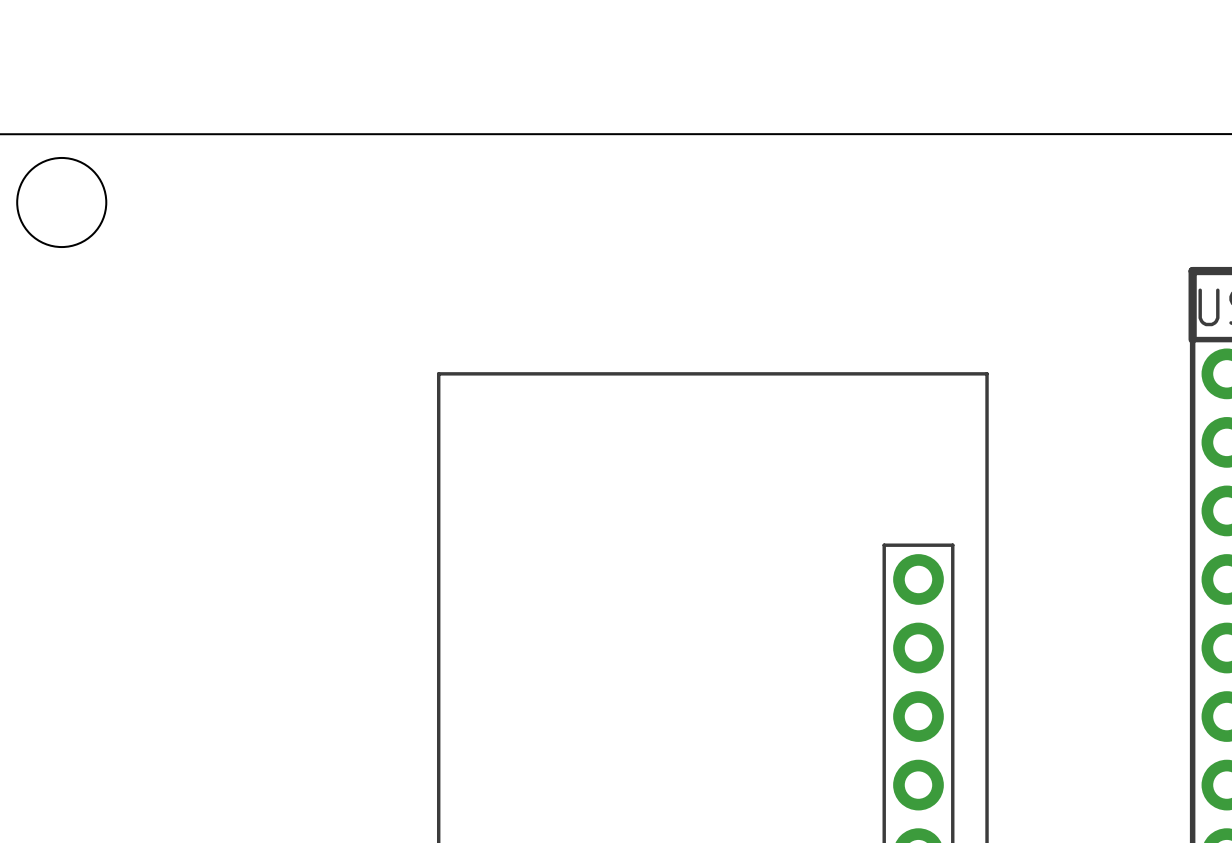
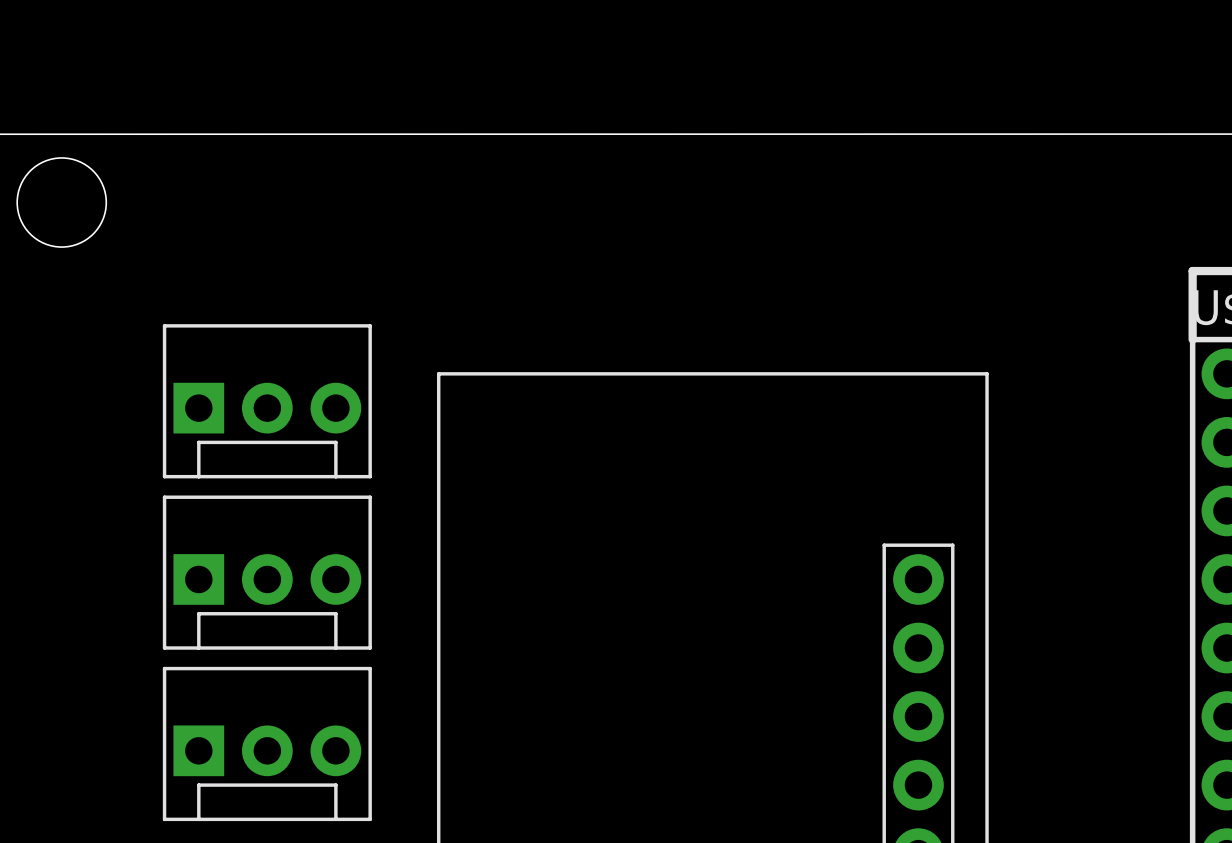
part: none -> (267, 401)
part: none -> (267, 572)
part: none -> (267, 743)

